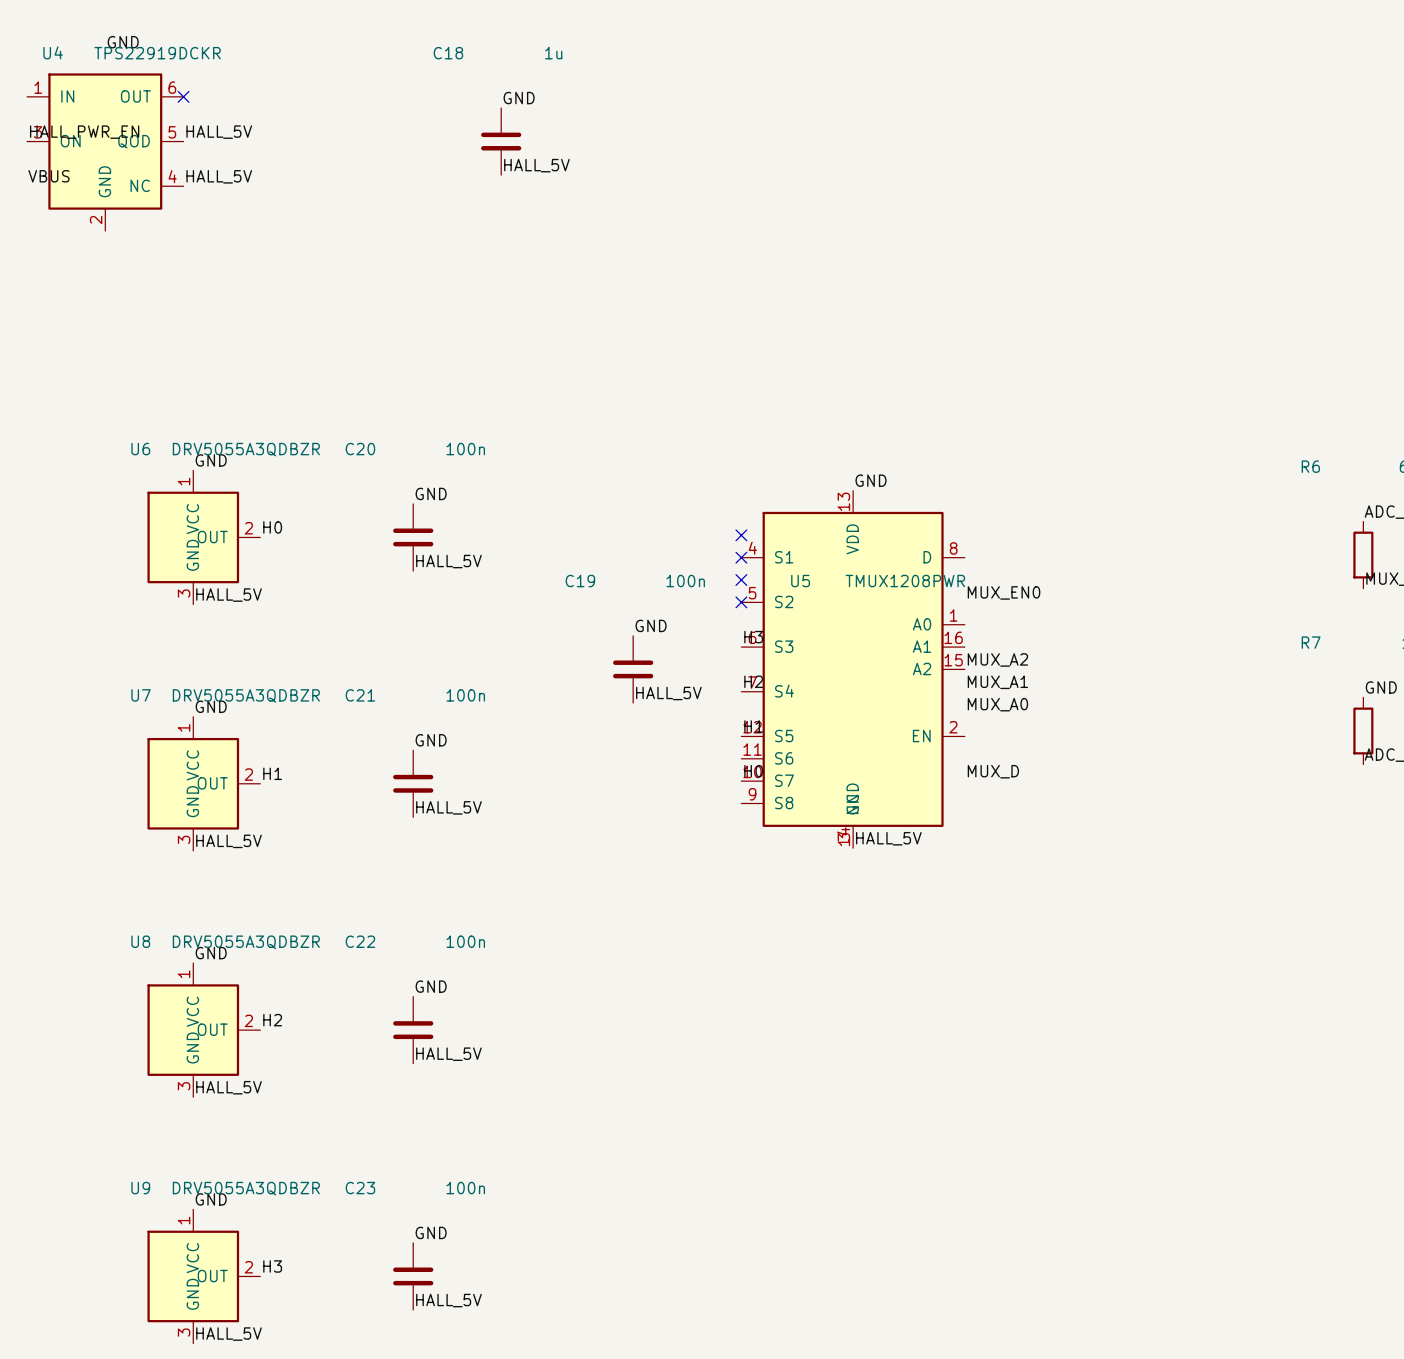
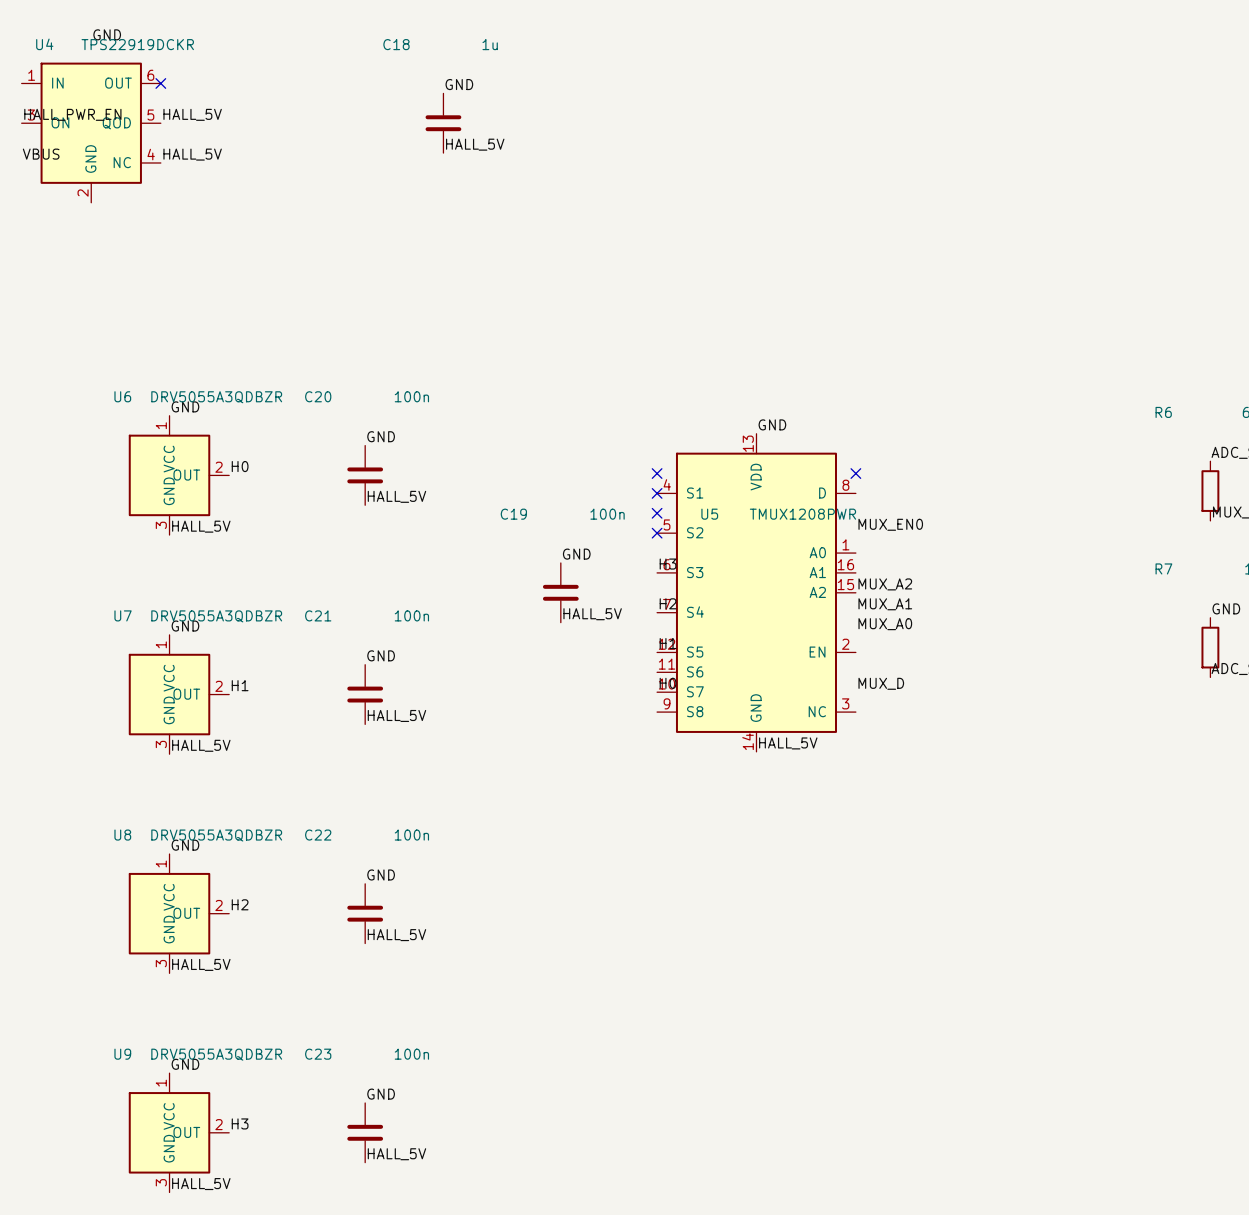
U5 symbol: [741, 490, 965, 849] -> [657, 433, 856, 752]
no-connect mark: none -> (855, 473)

